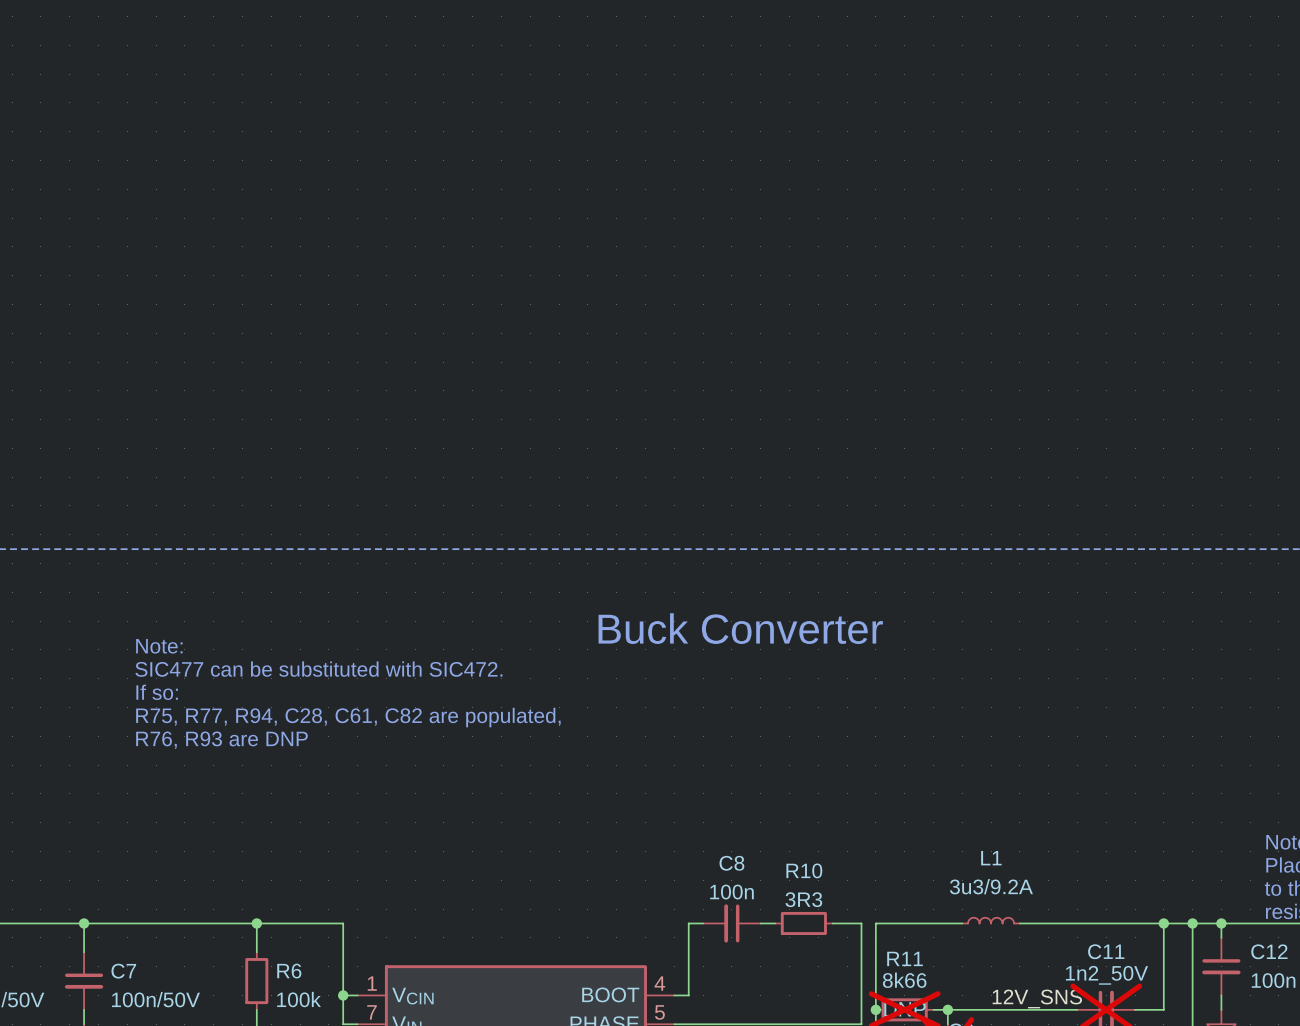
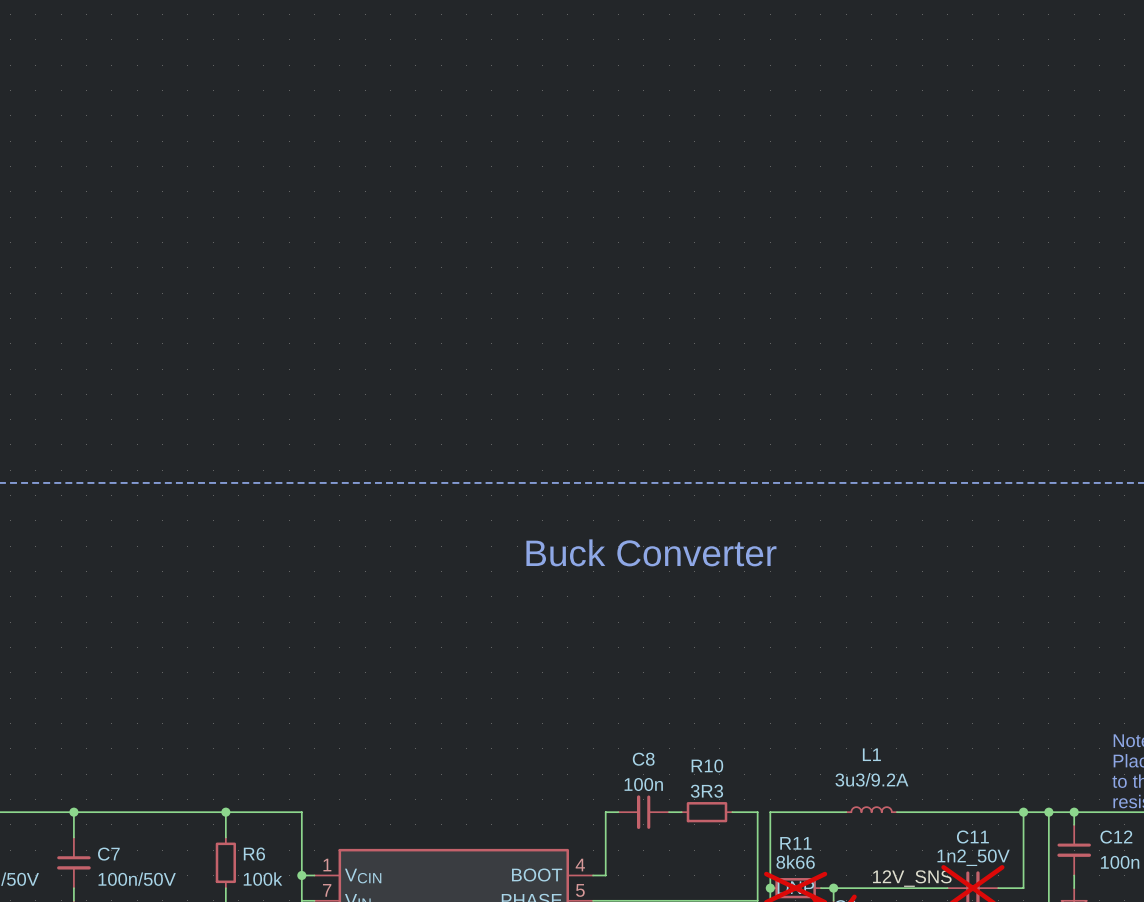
text: Note: (159, 646) -> none
text: SIC477 can be substituted with SIC472. (318, 669) -> none
text: If so: (157, 692) -> none
text: R75, R77, R94, C28, C61, C82 are populated, (348, 717) -> none
text: R76, R93 are DNP (221, 740) -> none

